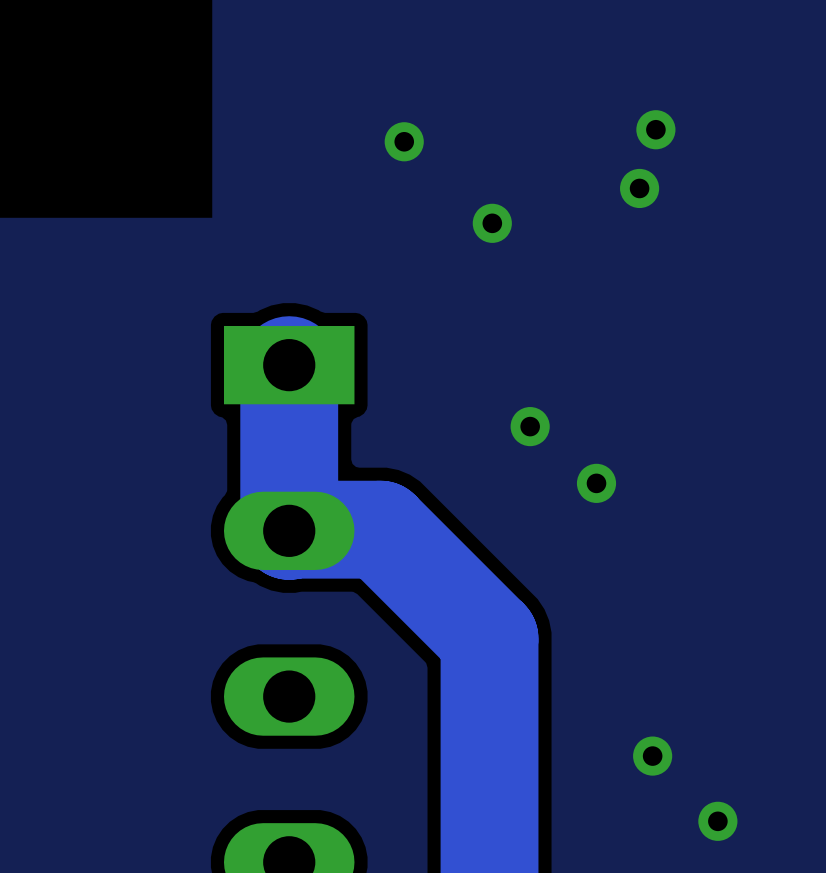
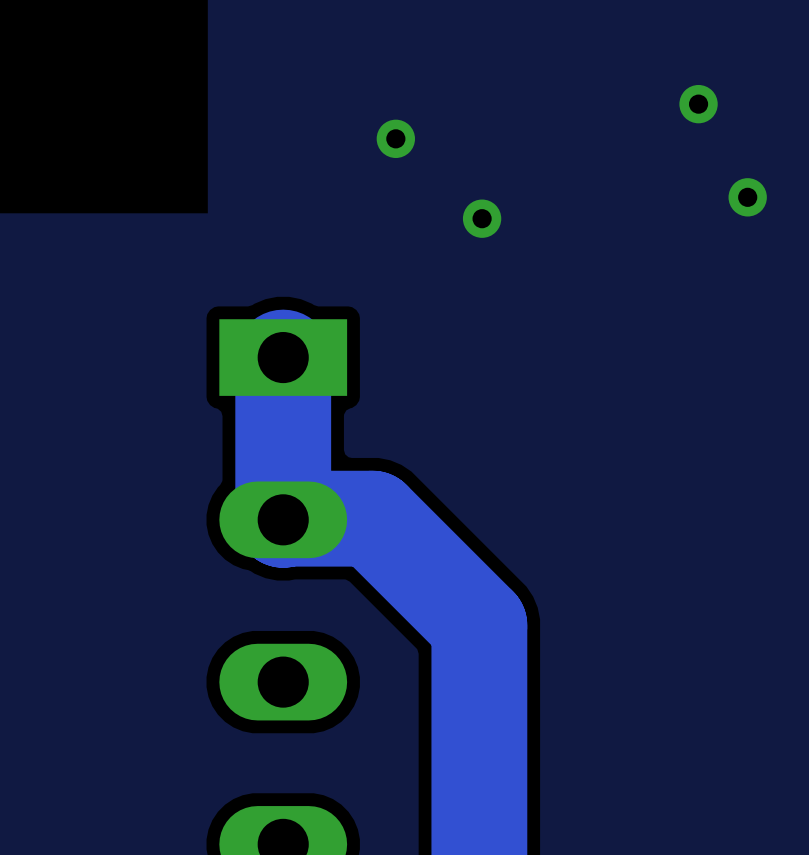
via: none -> (698, 104)
via: (655, 129) -> none
via: (639, 188) -> none
via: none -> (747, 197)
via: (530, 426) -> none
via: (596, 483) -> none
via: (652, 756) -> none
via: (717, 821) -> none

